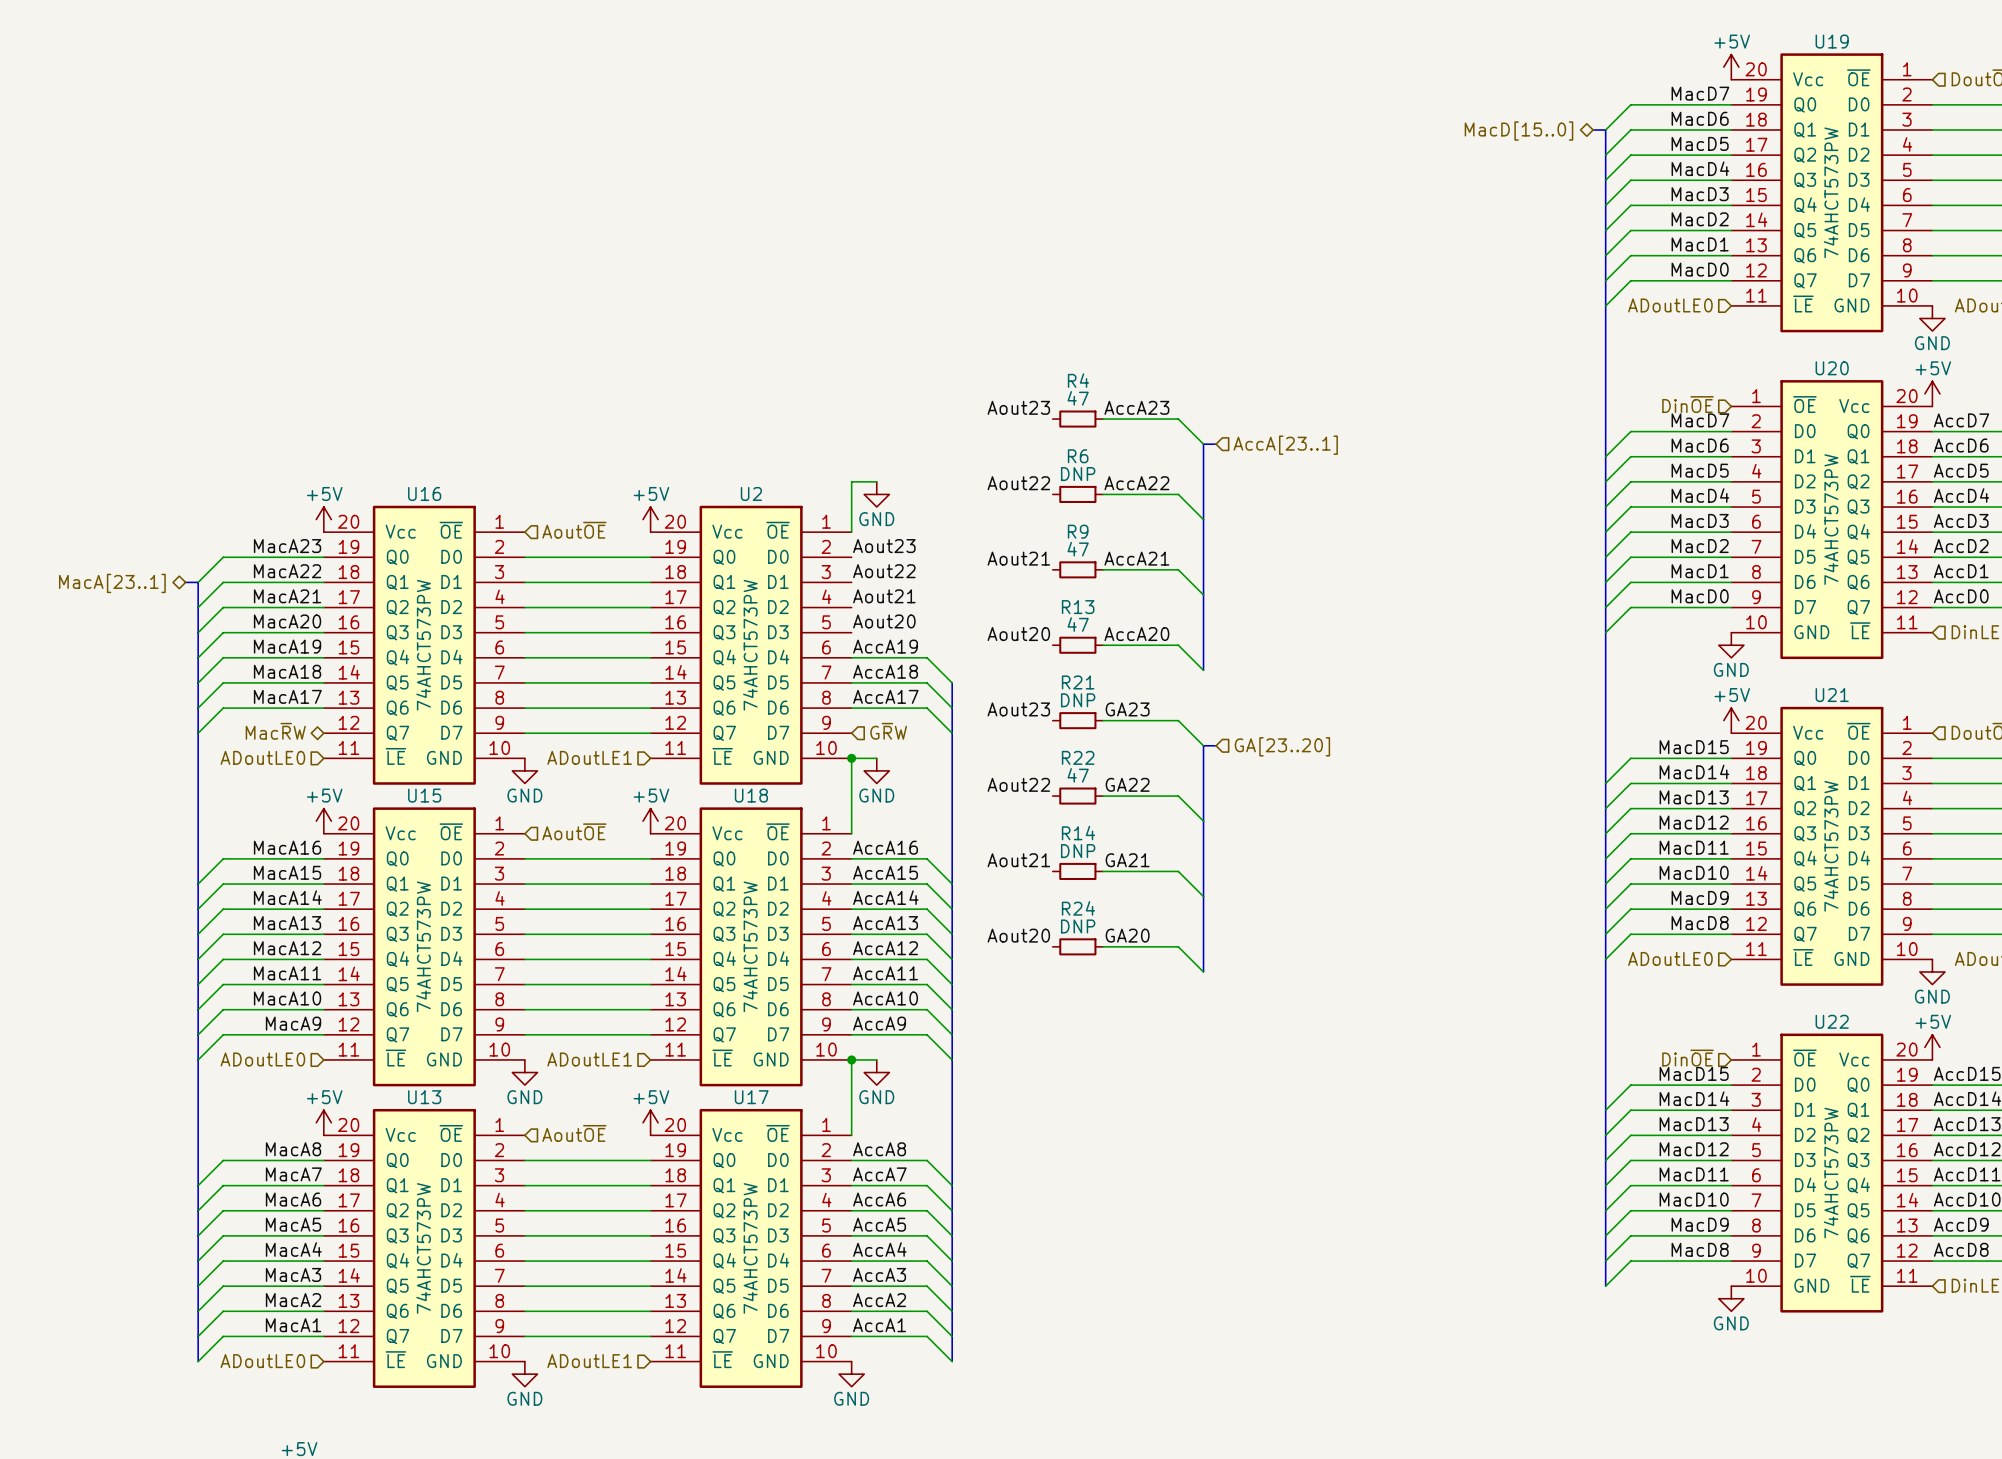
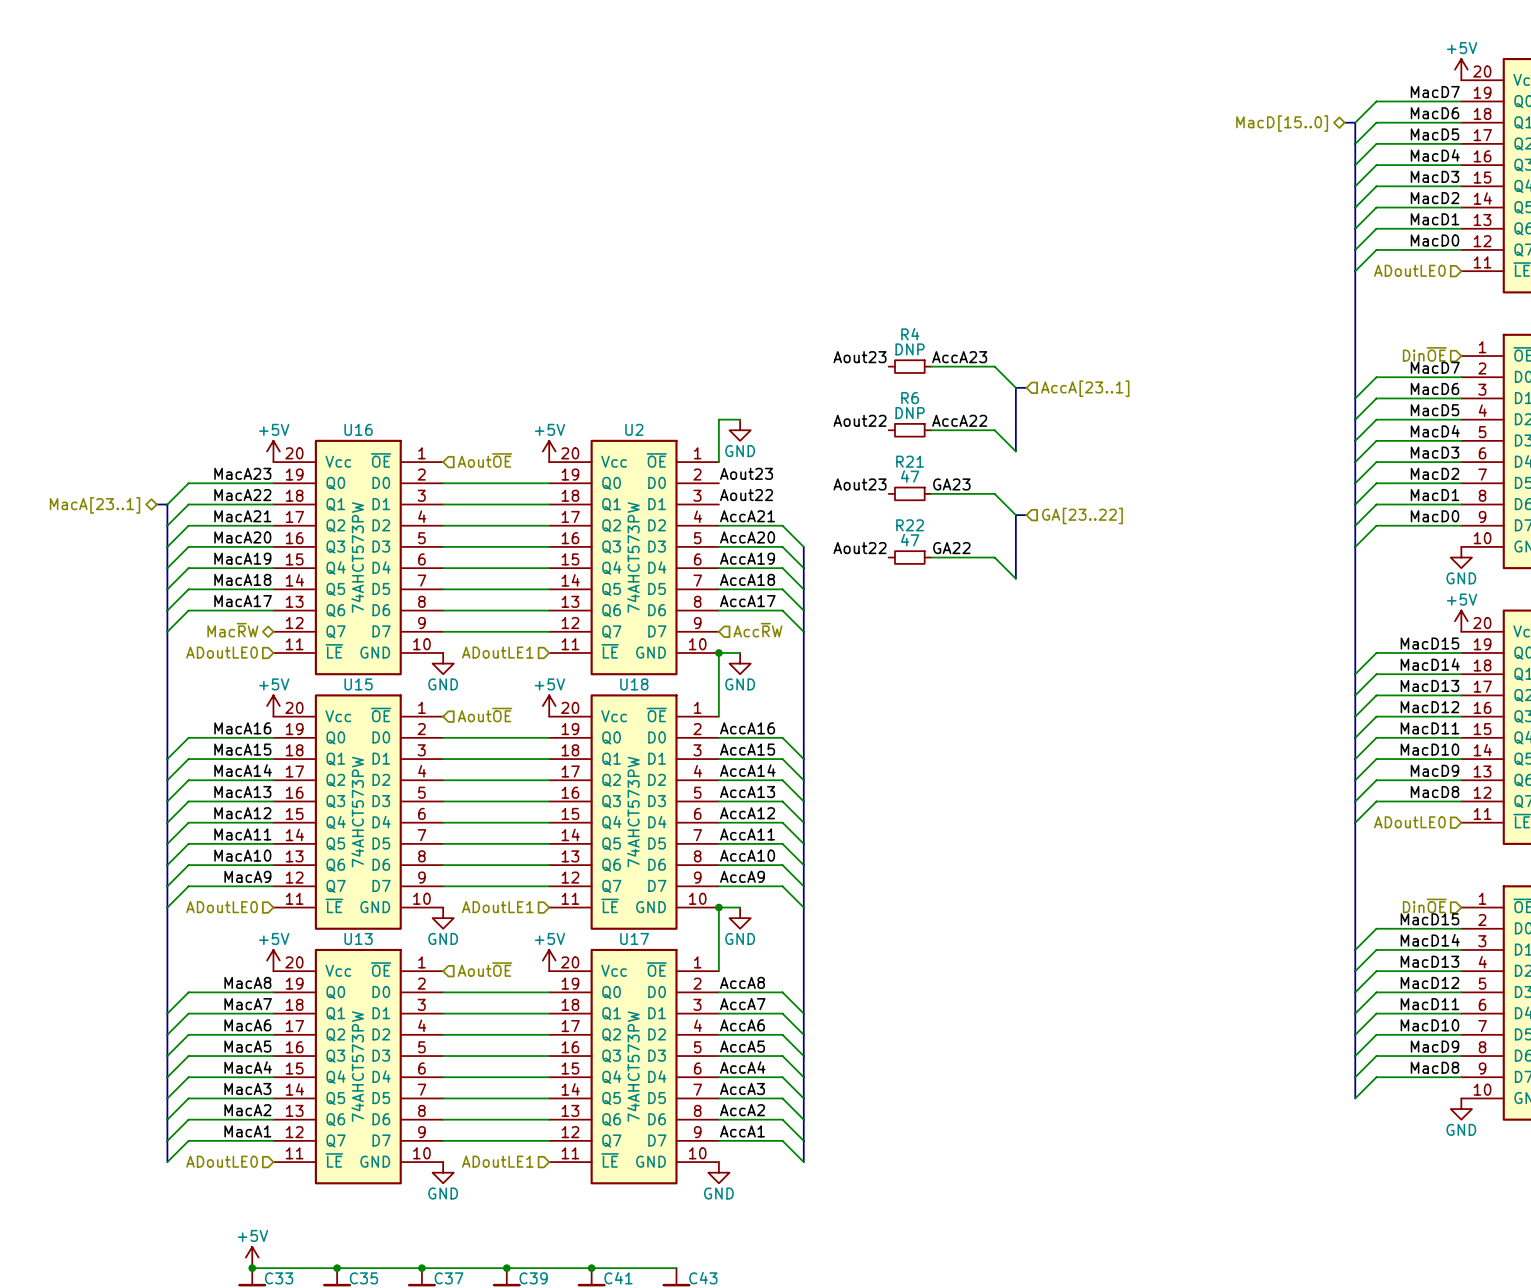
R4 value: 47 (1078, 398) -> DNP (910, 349)
bus: (1203, 519) (1203, 594) -> (1026, 515) (1015, 515)
R9 name: R9 (1078, 531) -> R21 (910, 461)
label: Aout21 (1018, 558) -> Aout23 (860, 484)
label: AccA21 (1136, 558) -> GA23 (951, 484)
label: Aout21 (884, 596) -> AccA21 (747, 516)
hierarchical label: none -> GA[23..22] (1082, 515)
wire: none -> (718, 525) (782, 525) (803, 546)
R13 name: R13 (1078, 607) -> R22 (910, 525)
label: Aout20 (884, 621) -> AccA20 (747, 537)
wire: none -> (718, 546) (782, 546) (803, 568)
bus: none -> (803, 546) (803, 589)
label: Aout20 (1018, 634) -> Aout22 (860, 548)
label: AccA20 (1136, 634) -> GA22 (951, 548)
label: Aout23 (1018, 709) -> none
label: GA23 (1127, 709) -> none
R21: DNP (1077, 720) -> none
wire: (1102, 720) (1178, 720) (1203, 745) -> none
hierarchical label: G~{R}W (888, 731) -> Acc~{R}W (757, 630)
bus: (1216, 745) (1203, 745) (1203, 971) -> none
hierarchical label: GA[23..20] (1282, 746) -> none
label: Aout22 (1018, 784) -> none
label: GA22 (1127, 784) -> none
R22: 47 (1077, 796) -> none
wire: (1102, 796) (1178, 796) (1203, 821) -> none
label: Aout21 (1018, 860) -> none
label: GA21 (1127, 860) -> none
R14: DNP (1077, 871) -> none
wire: (1102, 871) (1178, 871) (1203, 896) -> none
label: Aout20 (1018, 935) -> none
label: GA20 (1127, 935) -> none
R24: DNP (1077, 946) -> none
wire: (1102, 946) (1178, 946) (1203, 971) -> none

